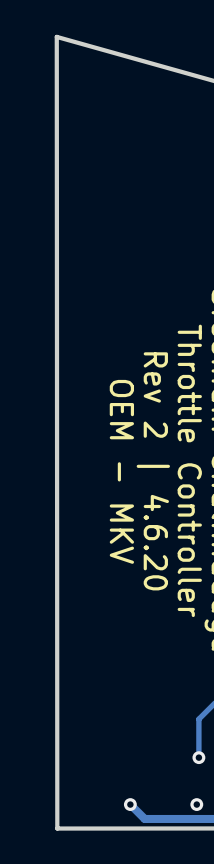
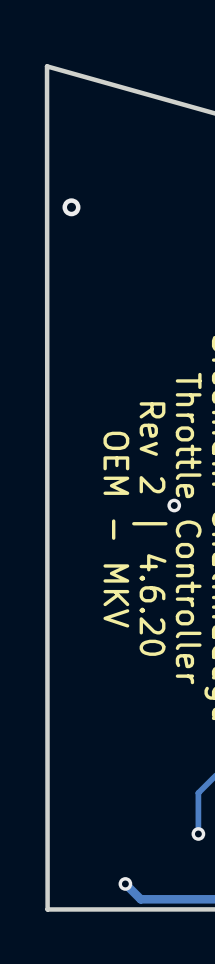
via: none -> (71, 207)
via: none -> (174, 505)
via: (196, 804) -> none

